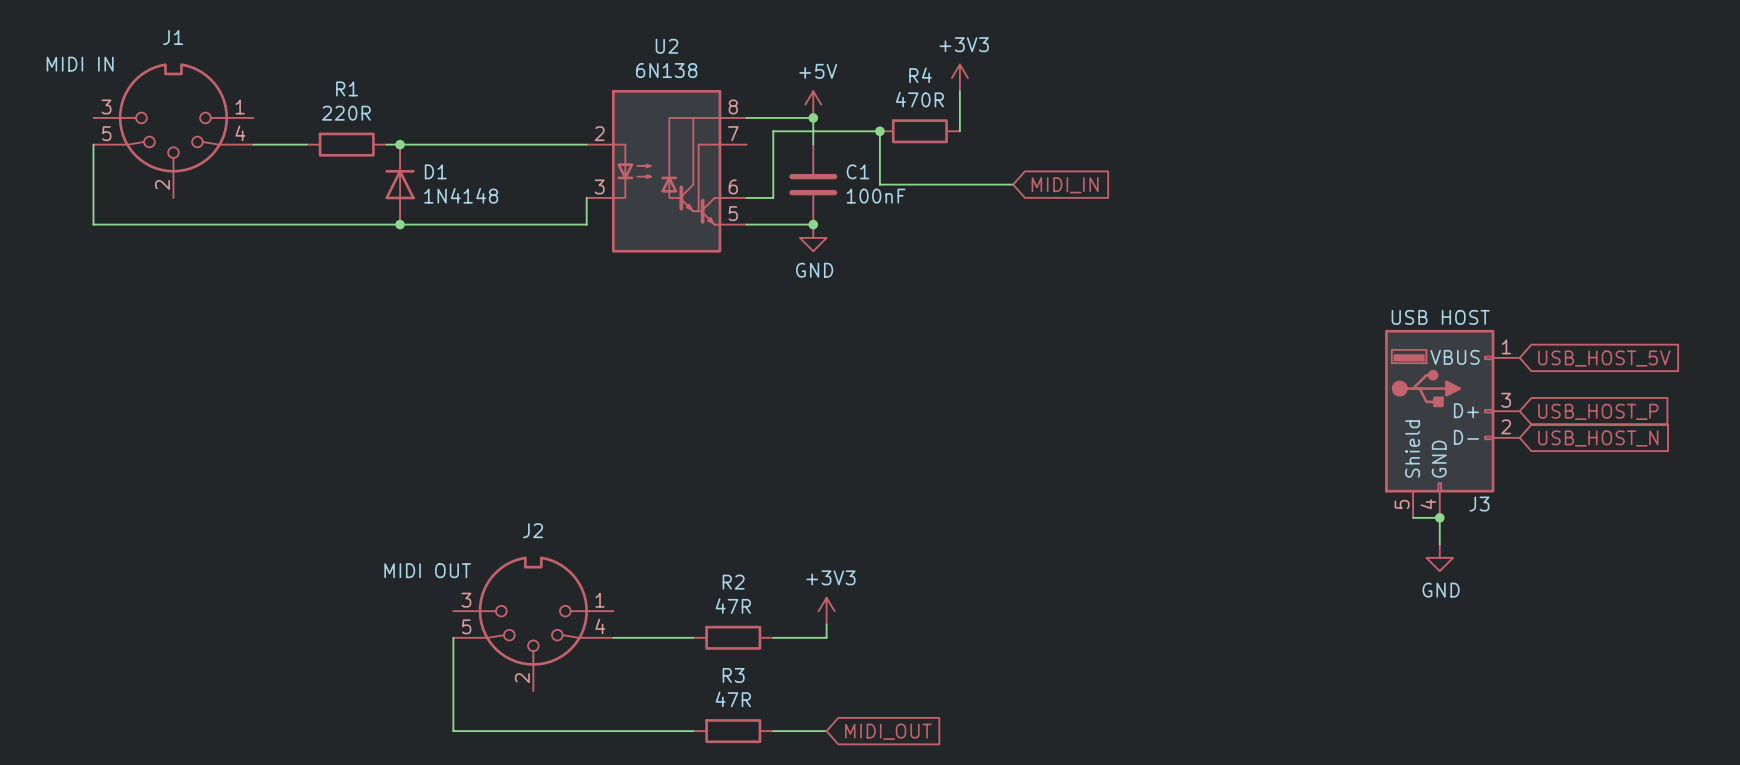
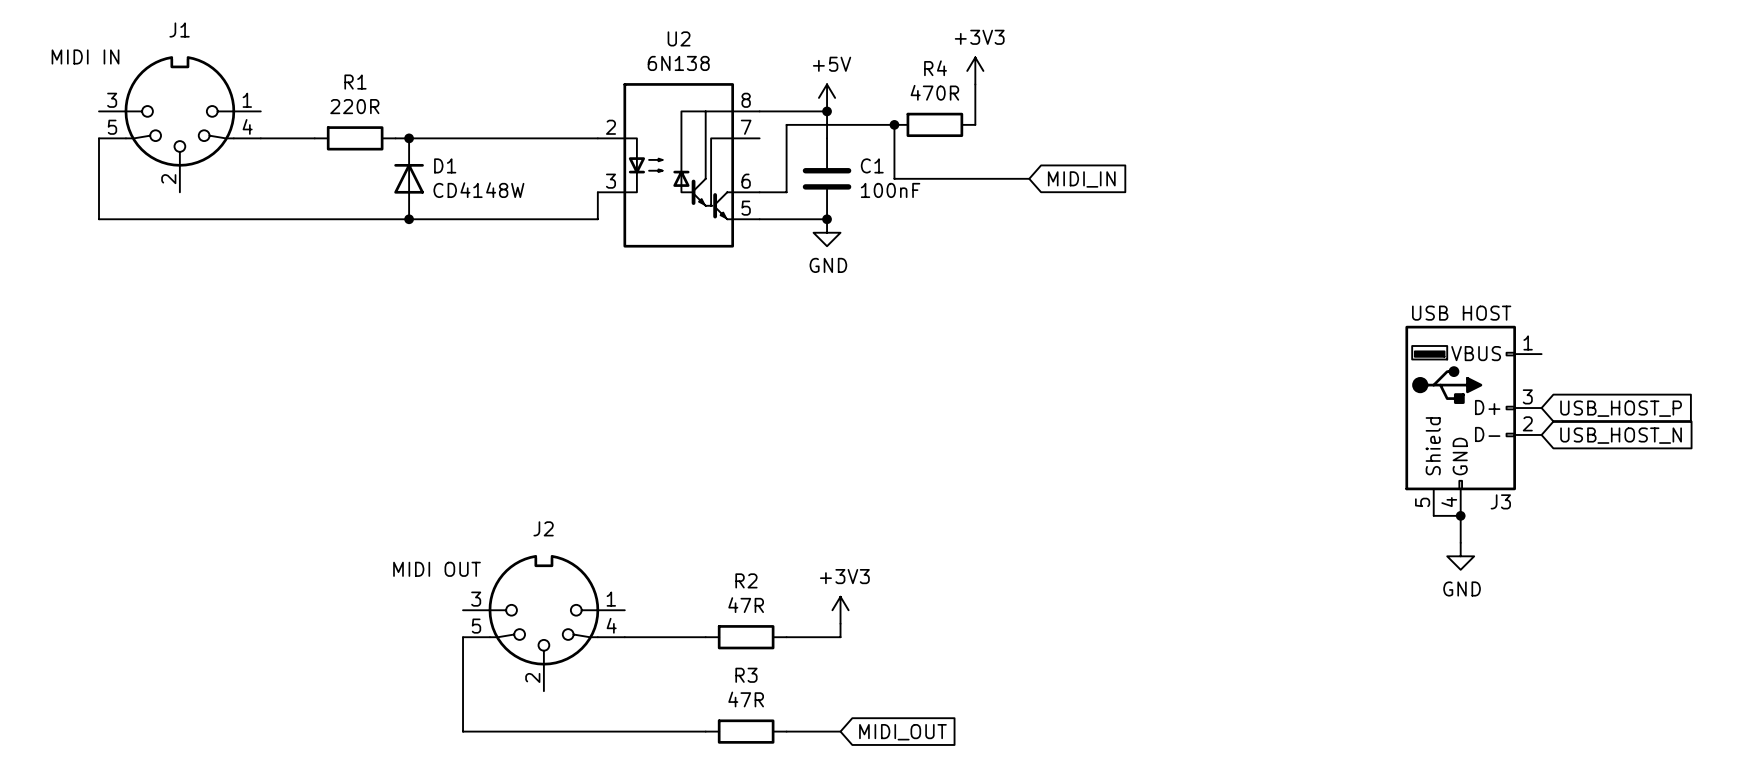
D1 value: 1N4148 (461, 195) -> CD4148W (478, 190)
global label: USB_HOST_5V (1604, 358) -> none

